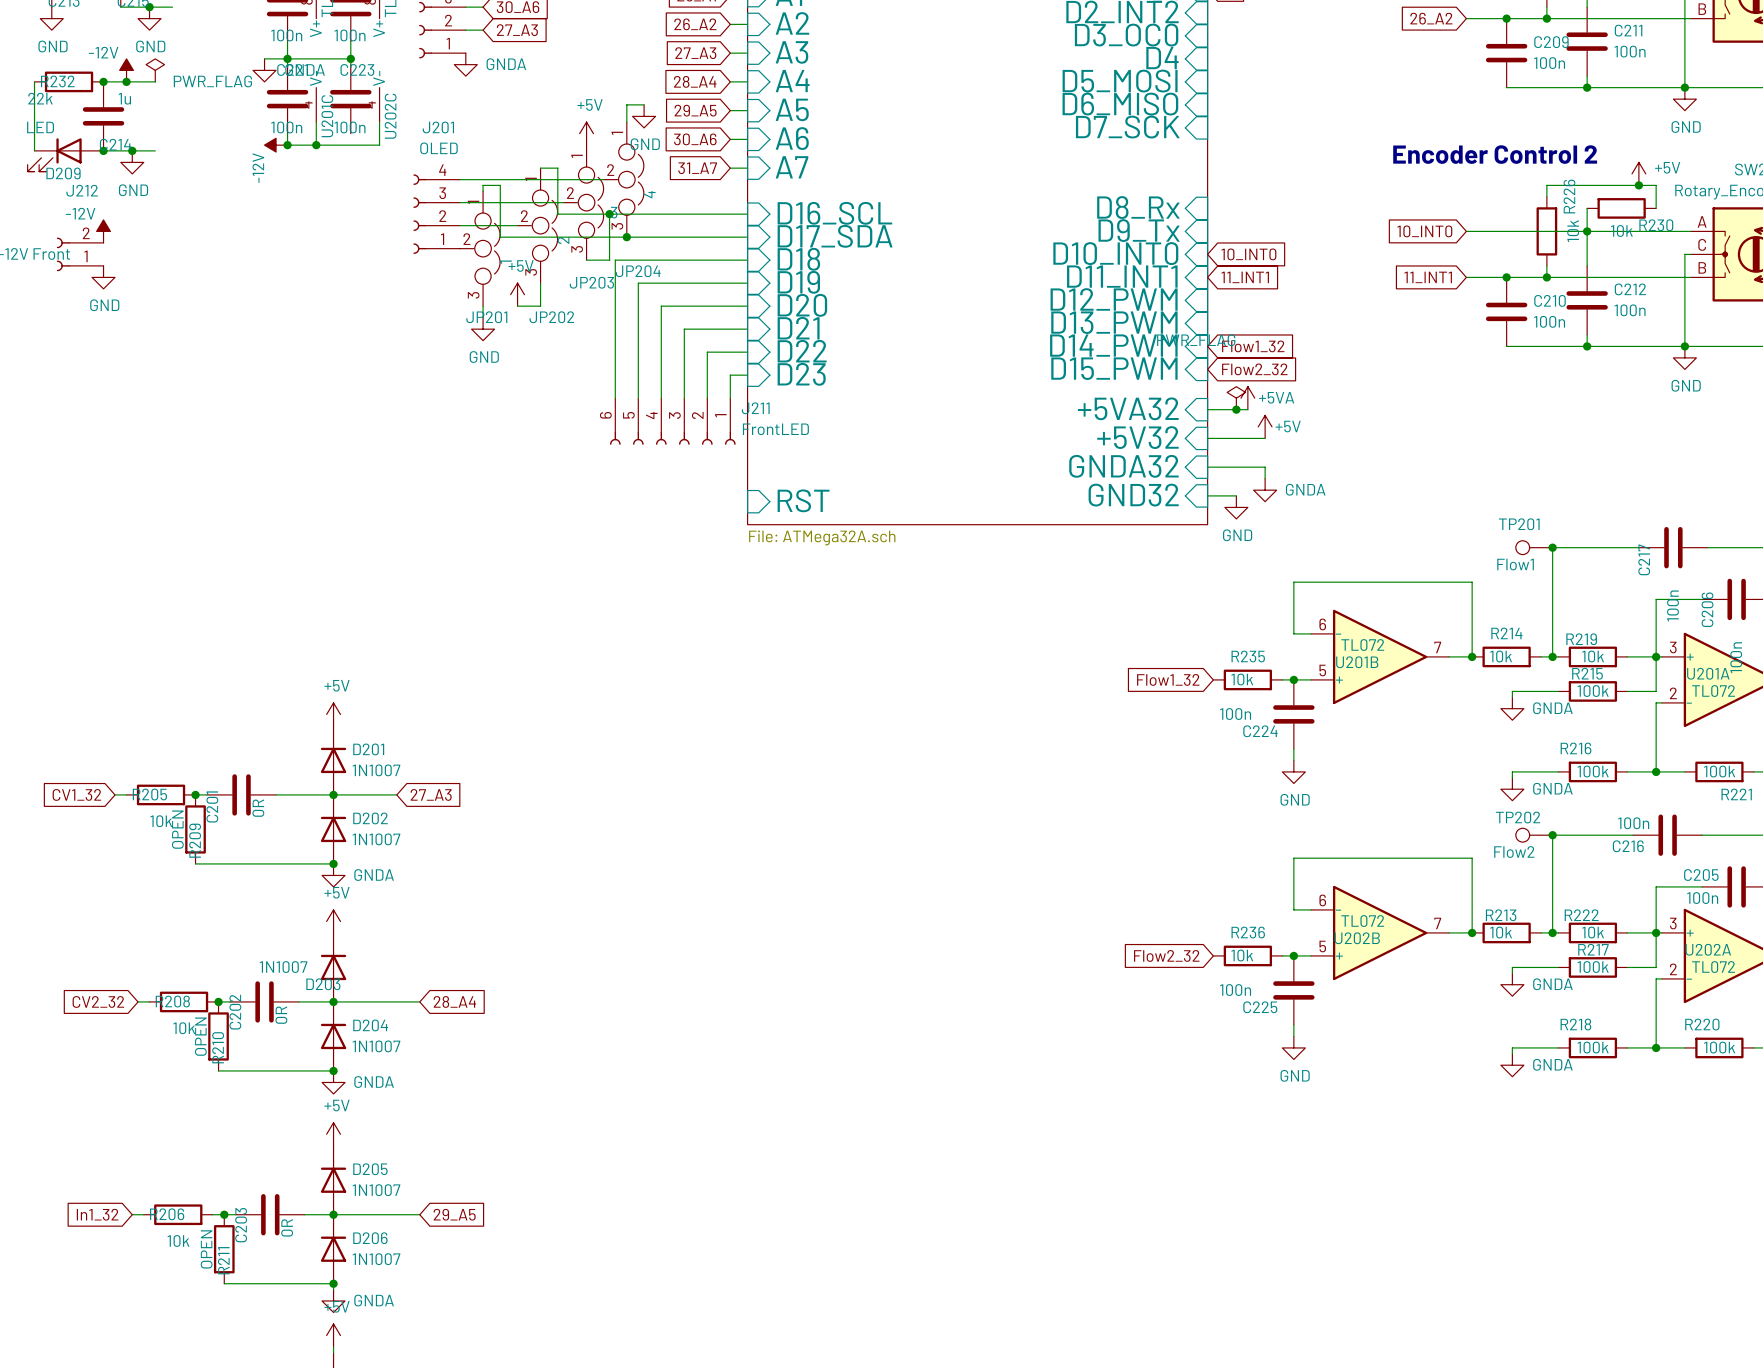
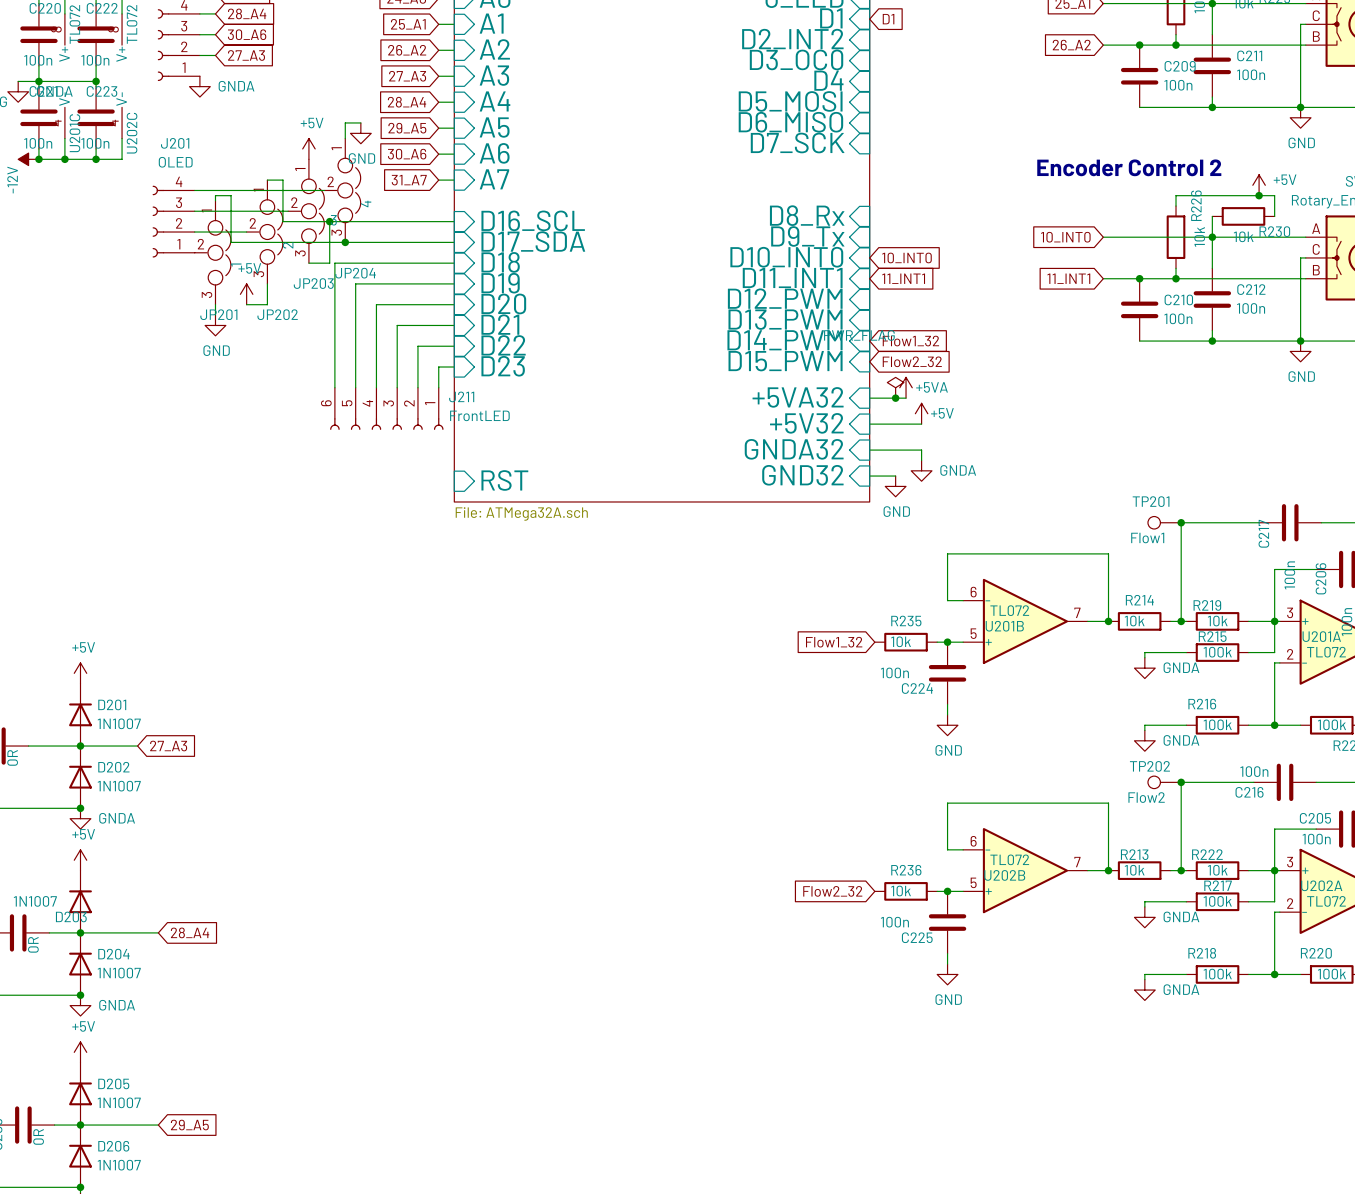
wire: none -> (96, 148) (96, 159)
junction: none -> (96, 159)

